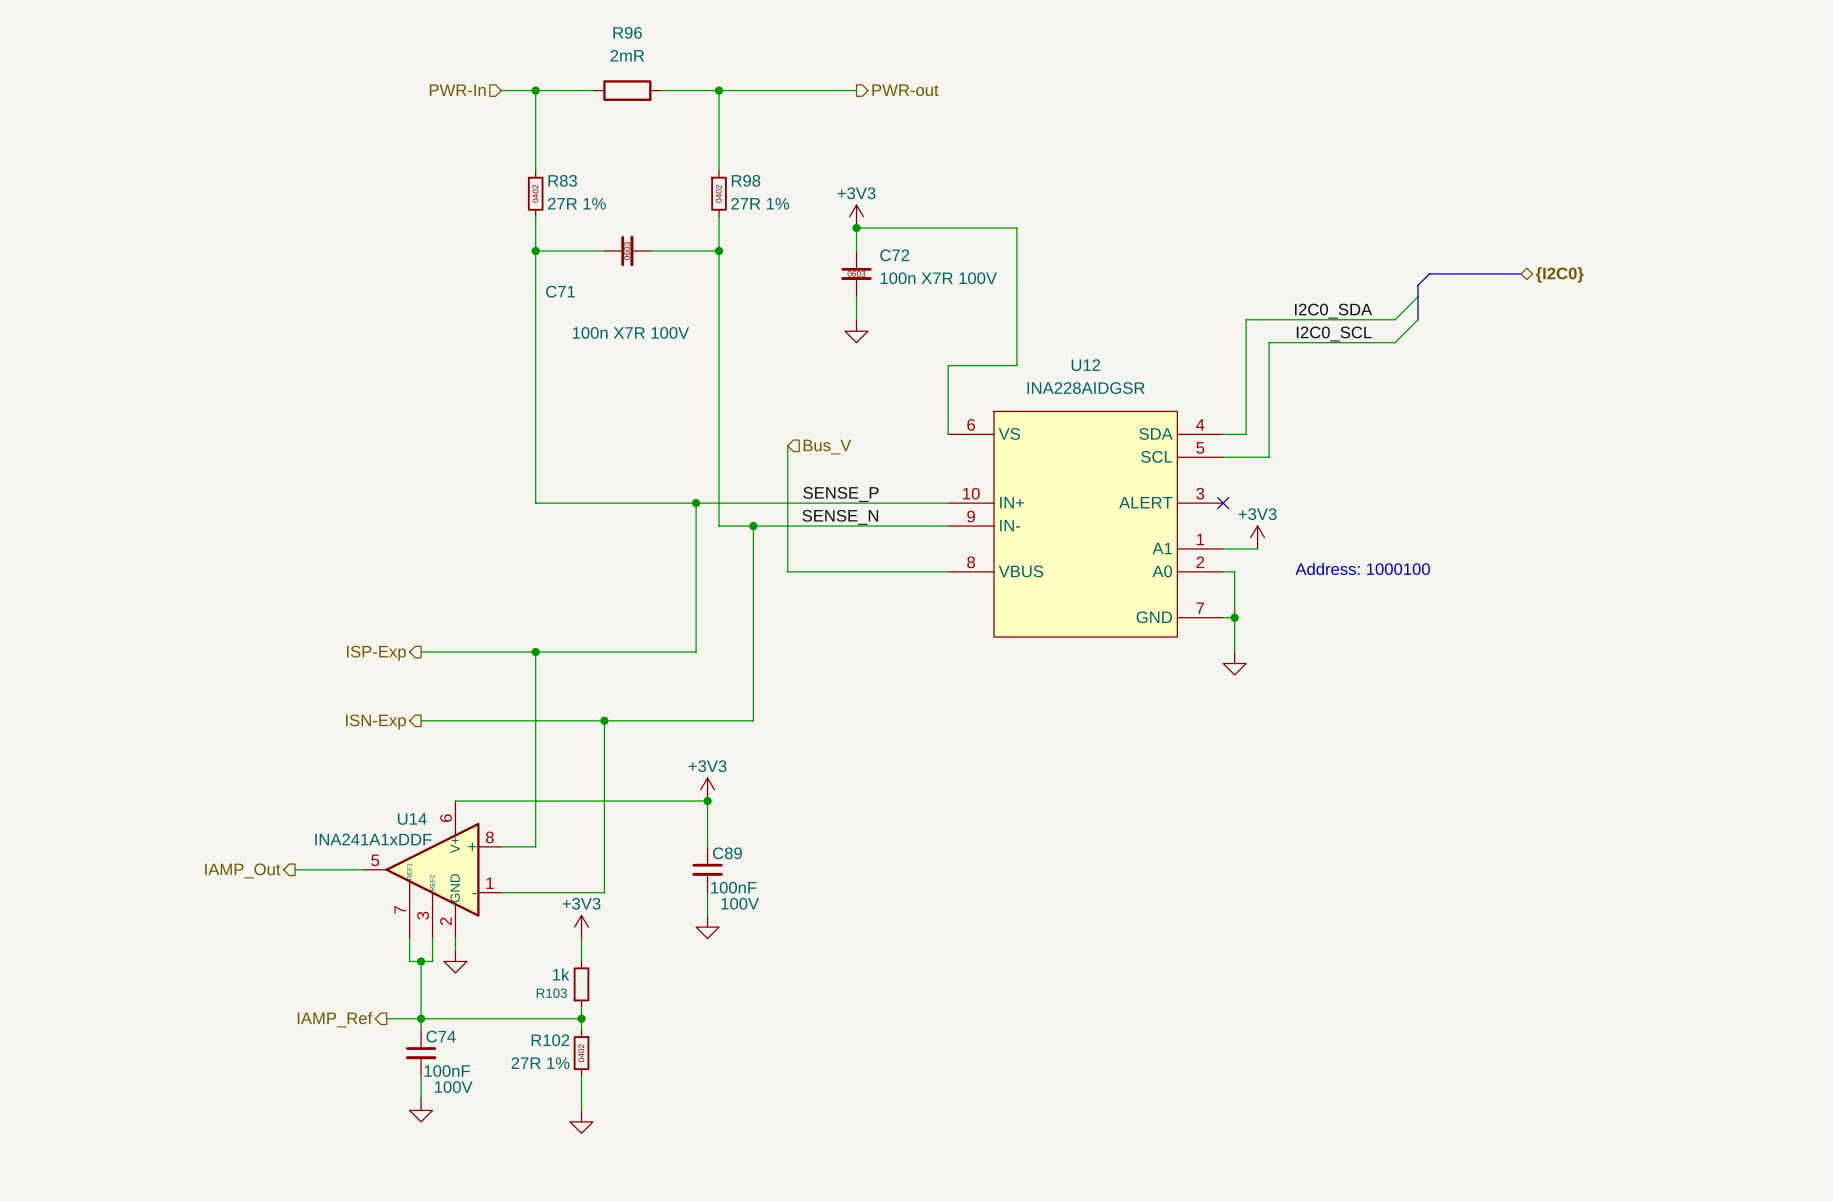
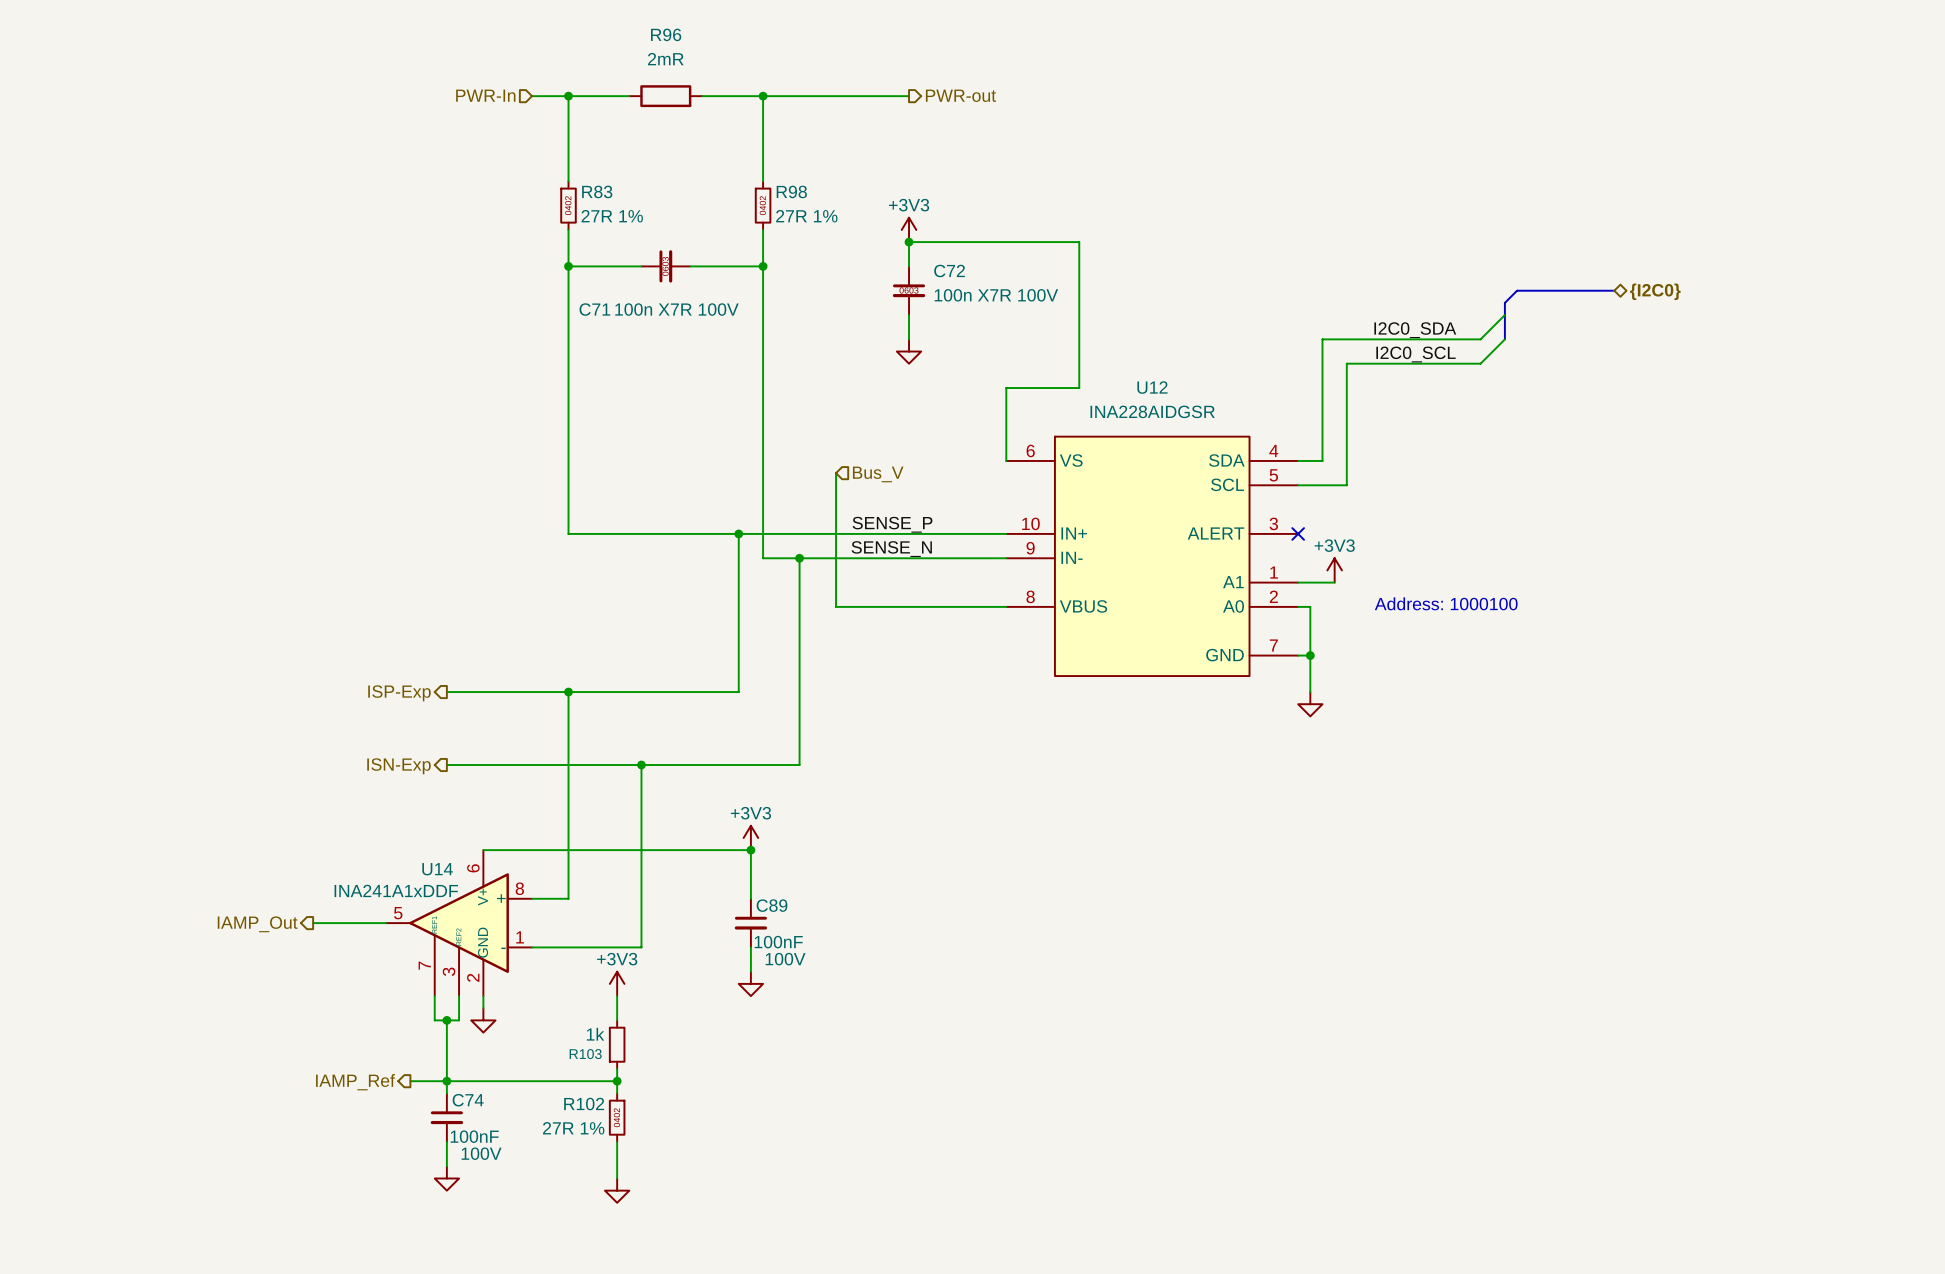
C71 value position: 100n X7R 100V (631, 332) -> 100n X7R 100V (676, 309)

